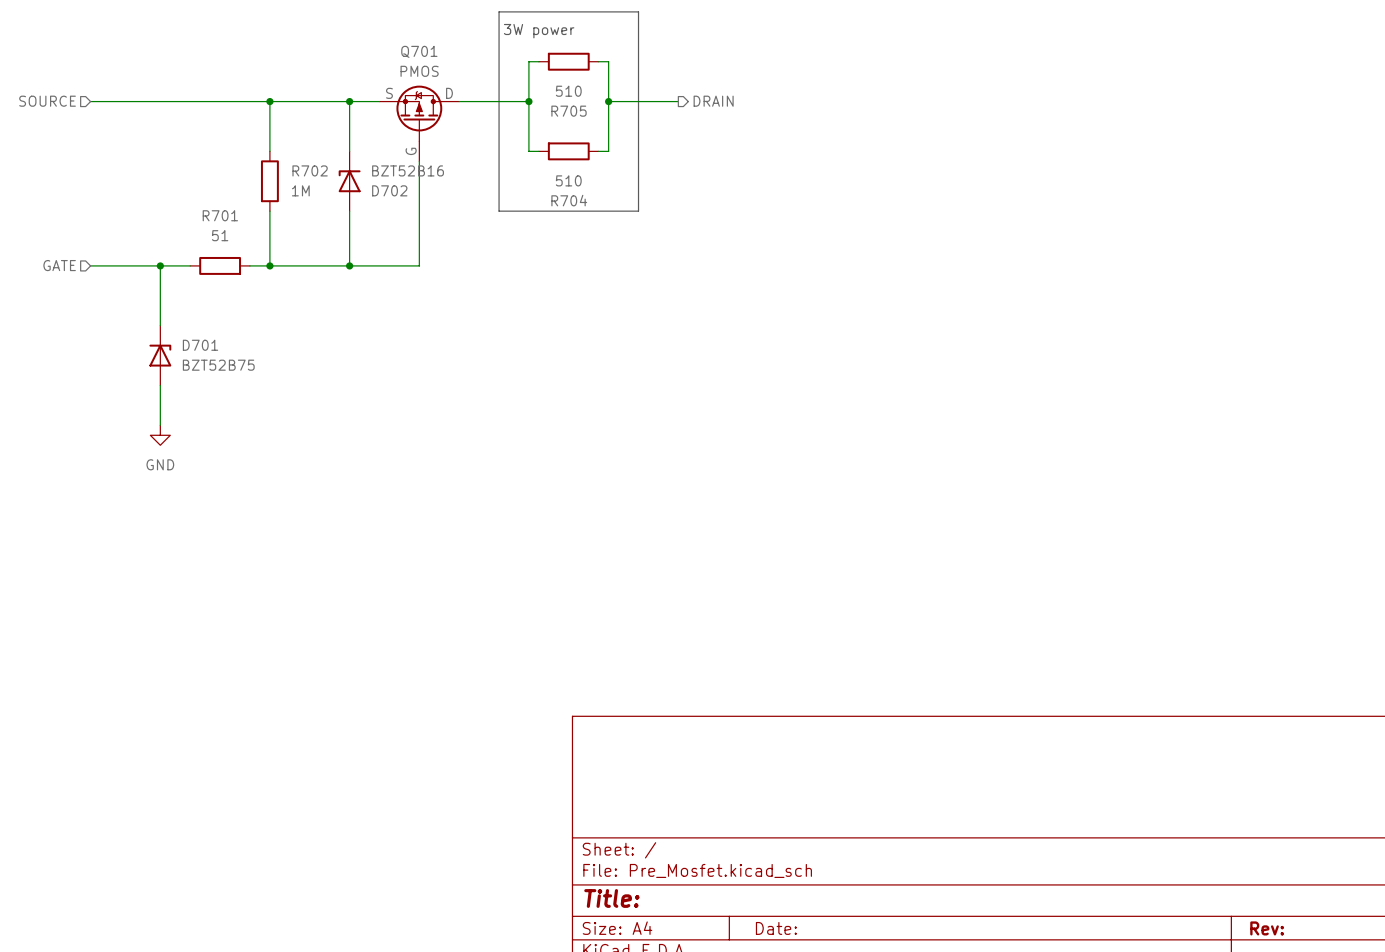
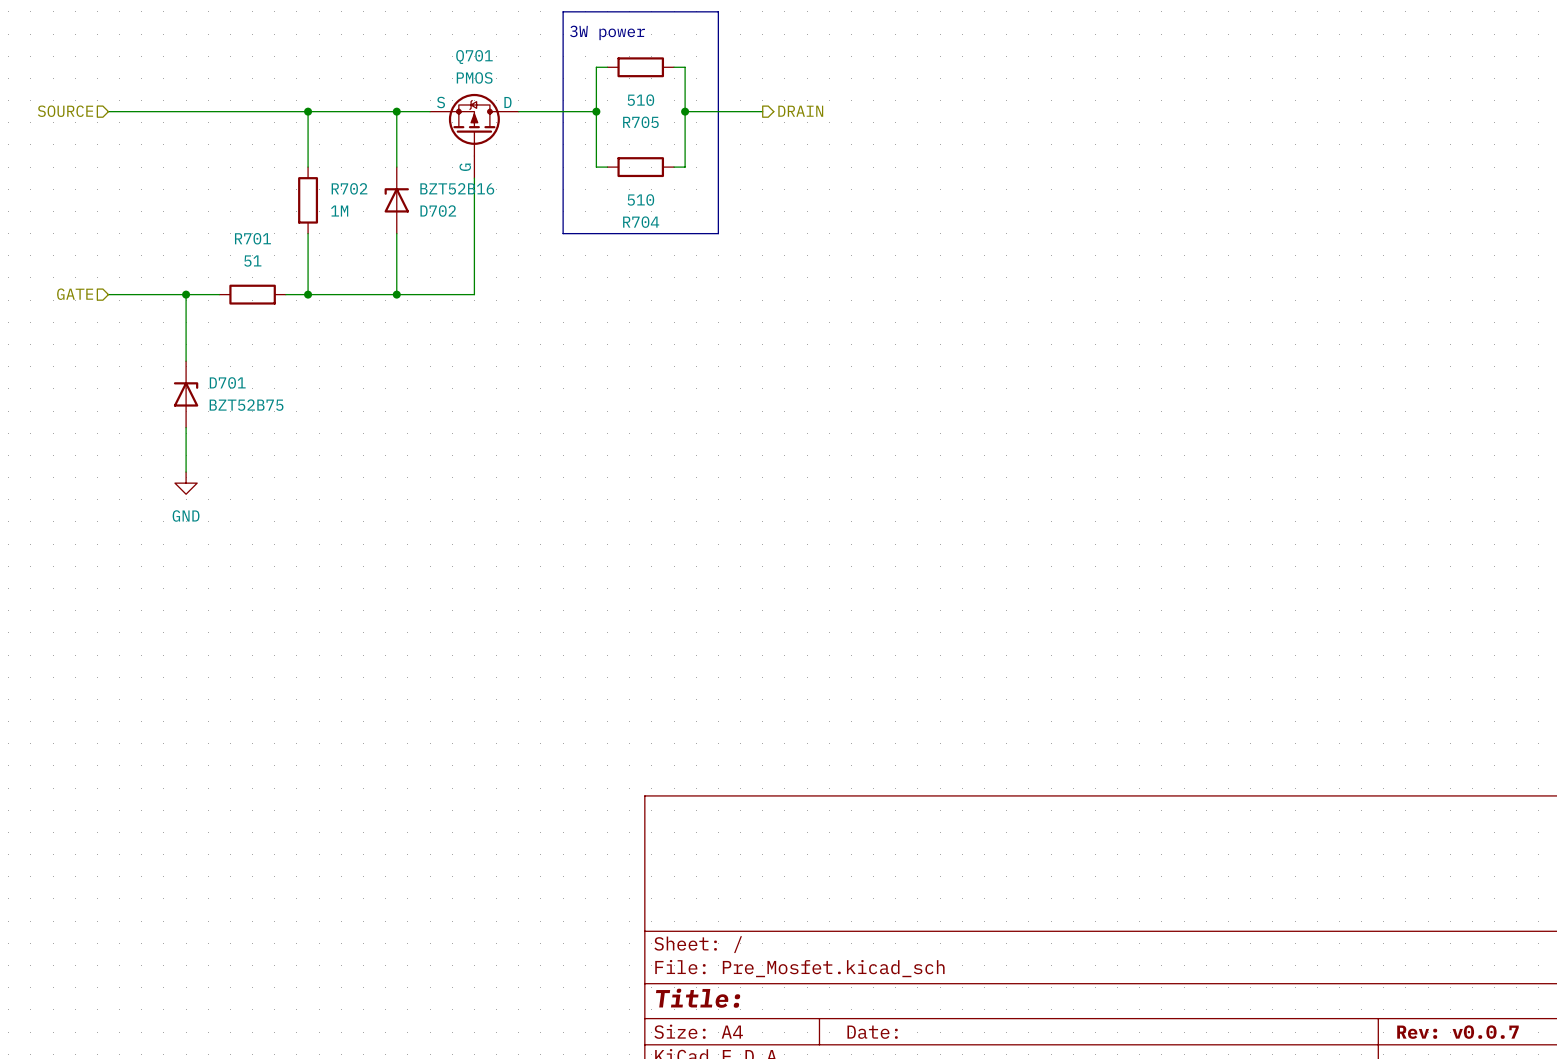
title block: Rev: (1267, 928) -> Rev: v0.0.7 (1457, 1032)

